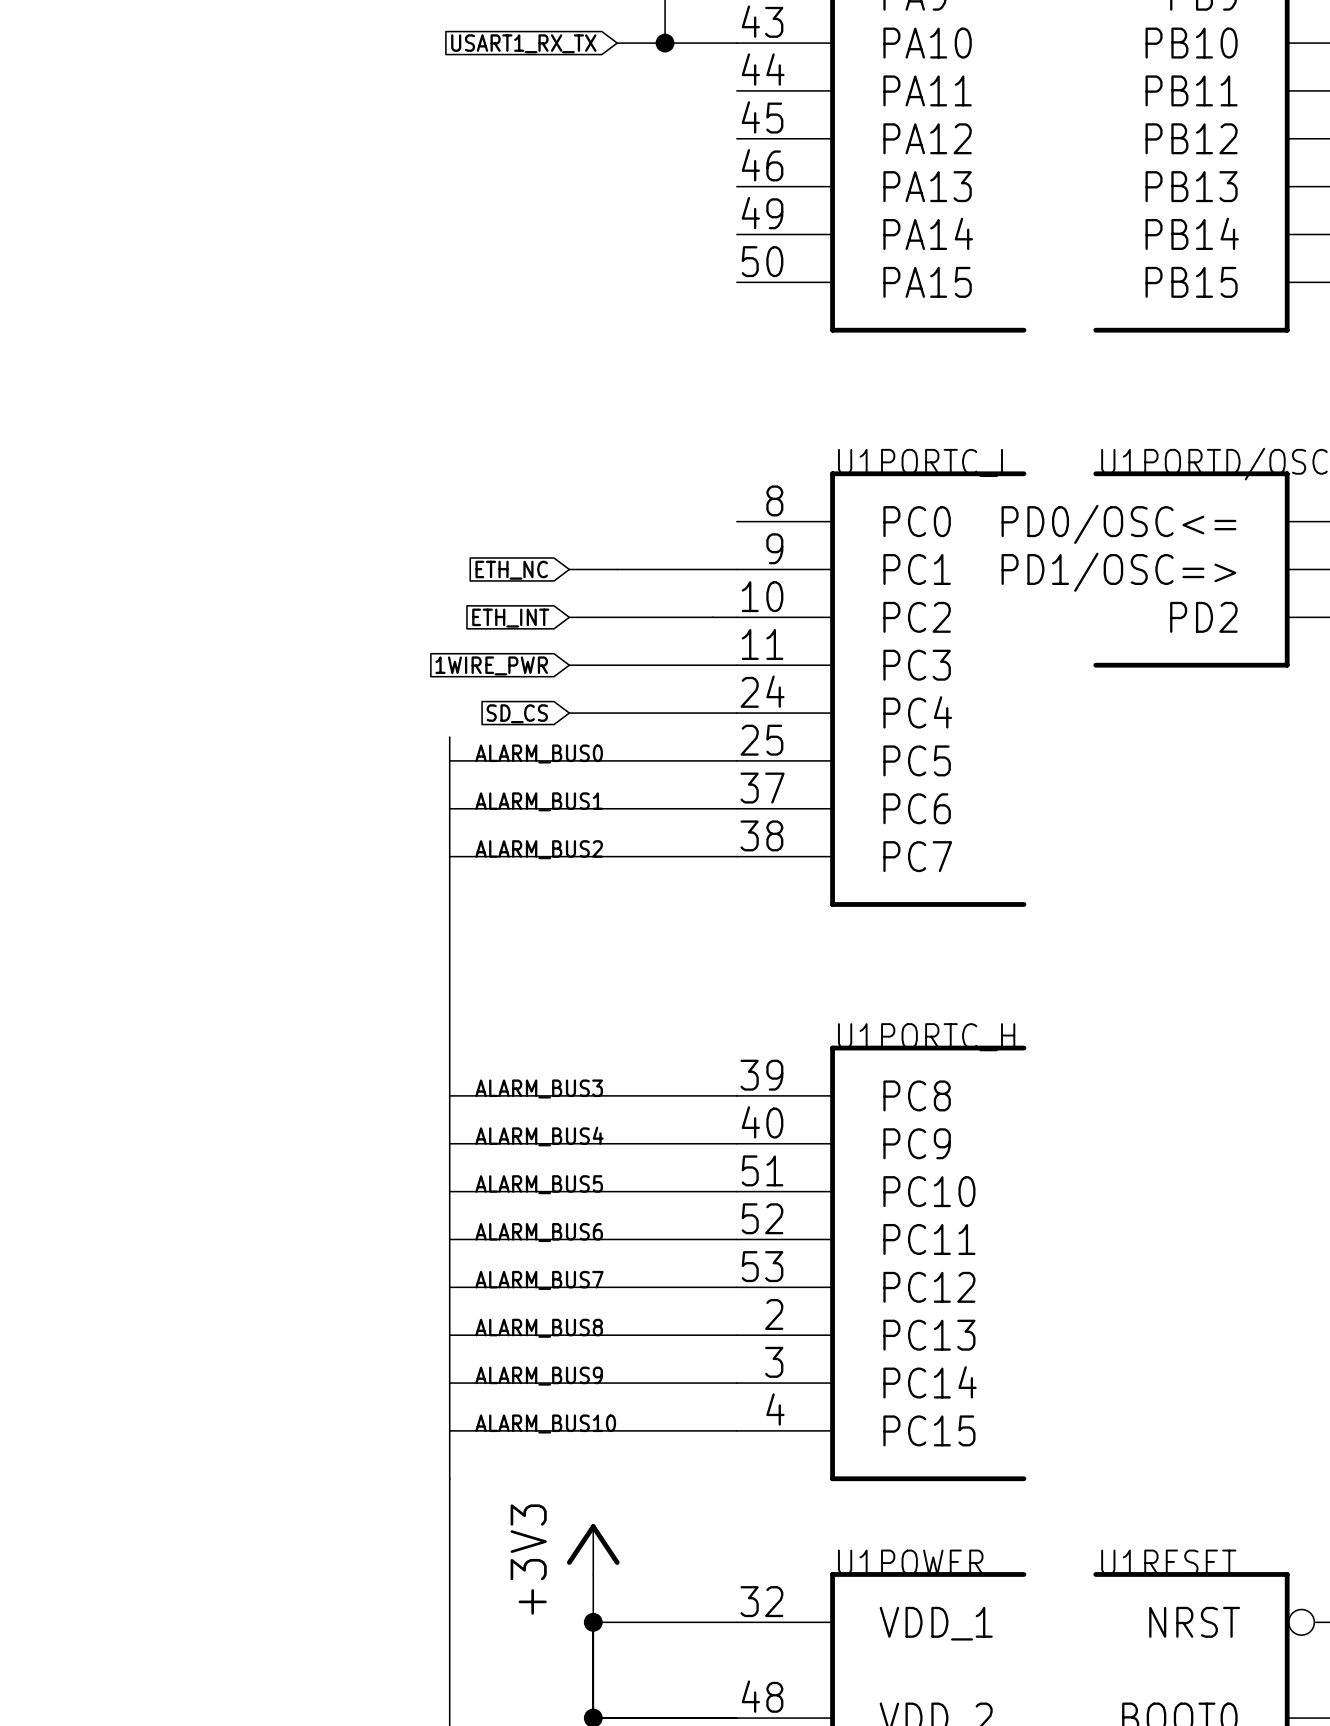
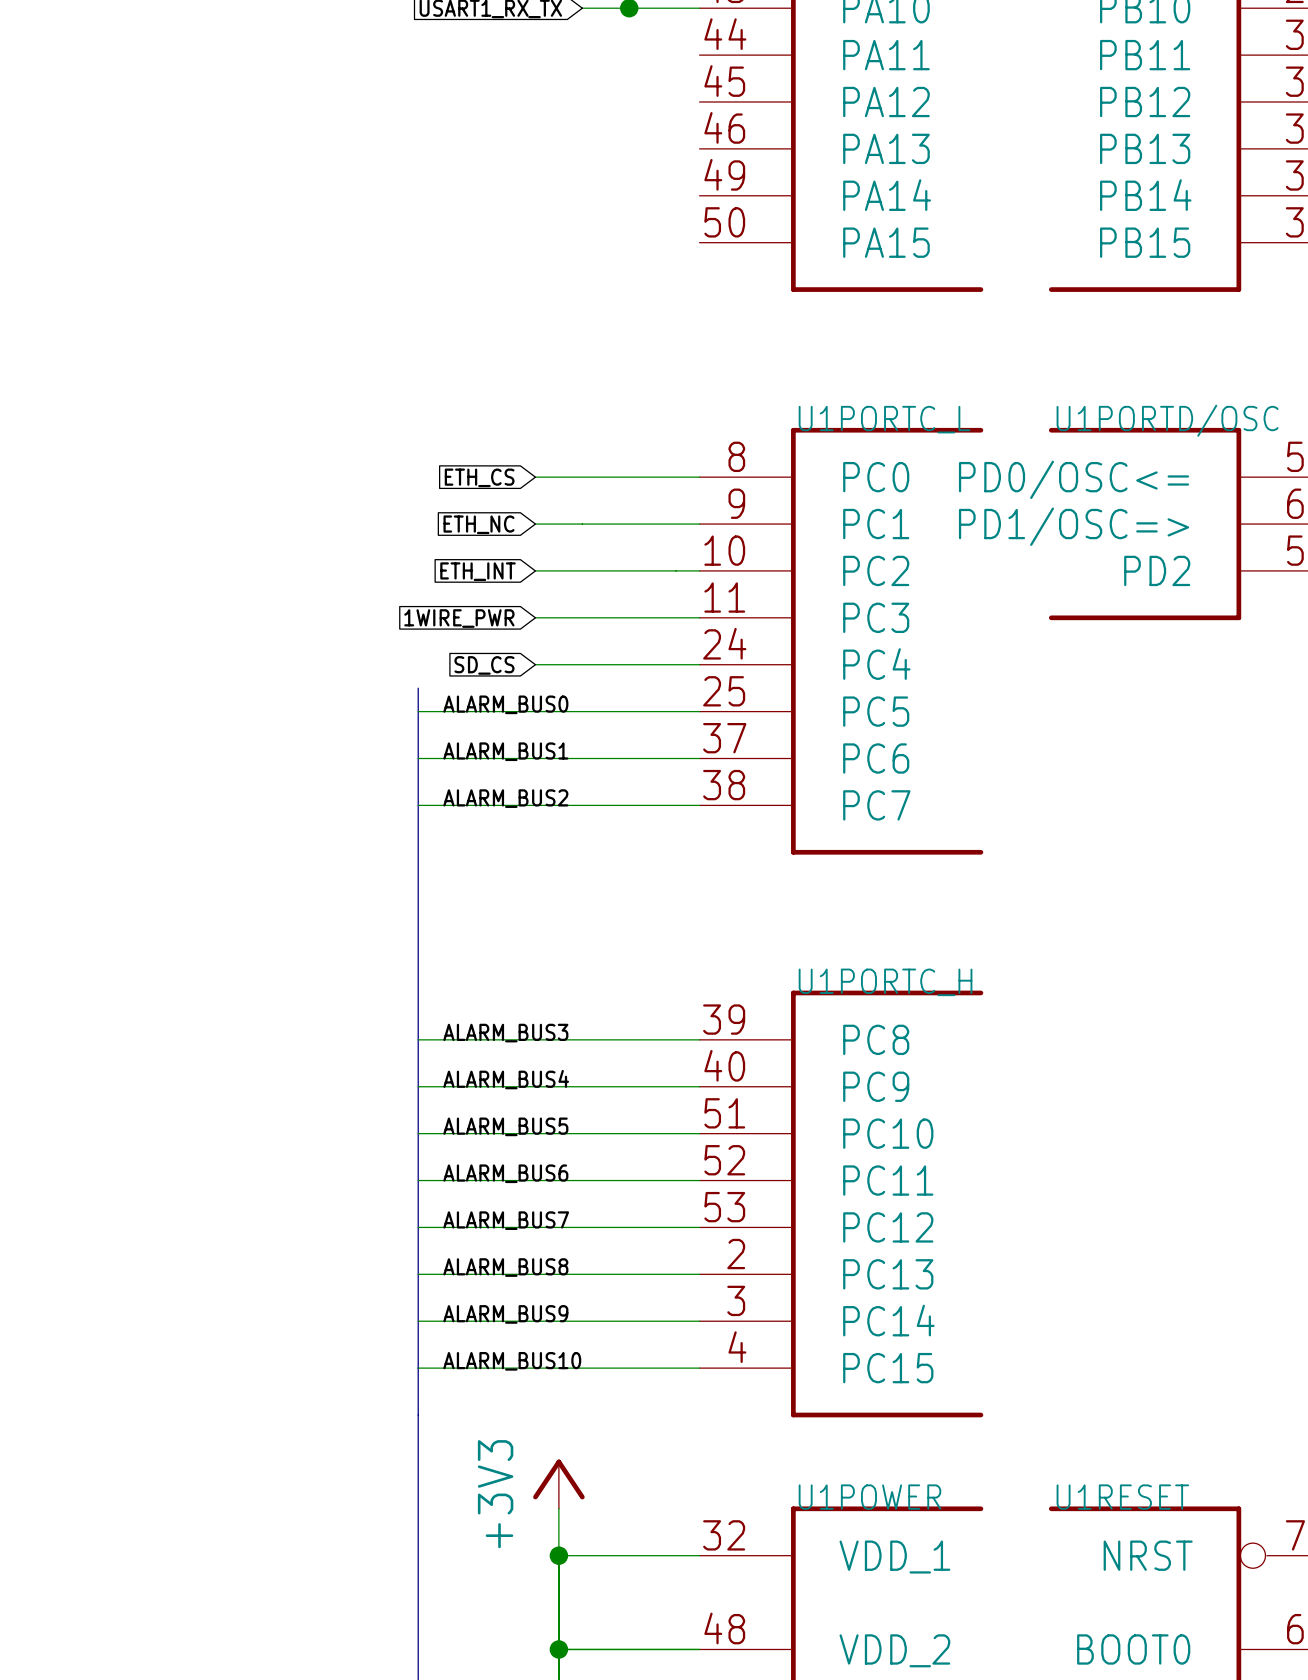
wire: none -> (535, 477) (699, 477)
global label: none -> ETH_CS (479, 477)

